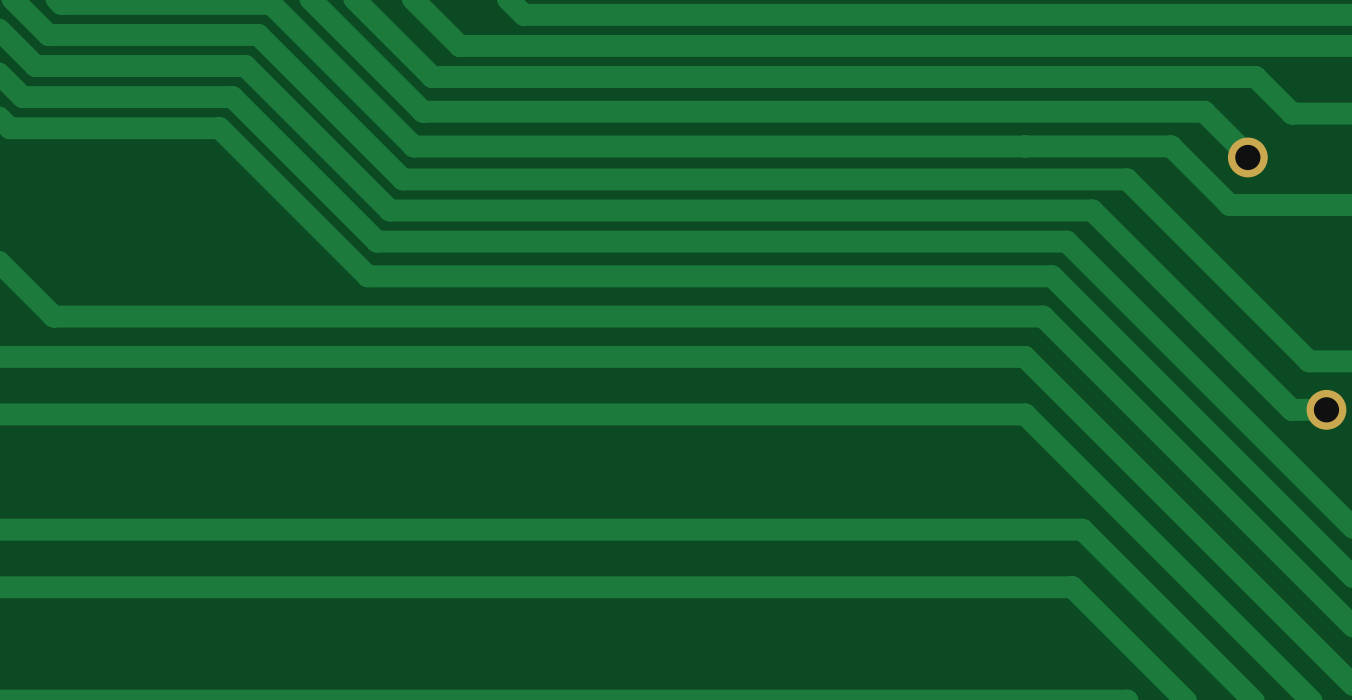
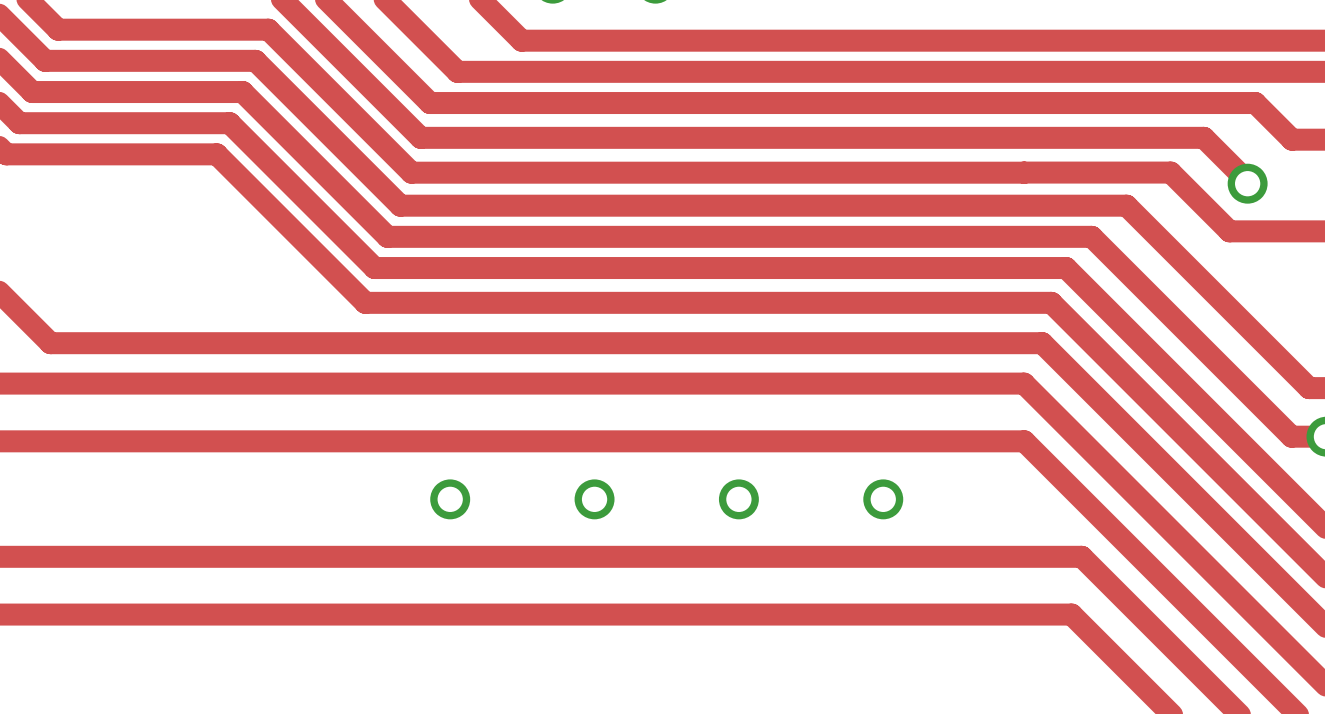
via: none -> (450, 499)
via: none -> (594, 499)
via: none -> (738, 499)
via: none -> (883, 499)

